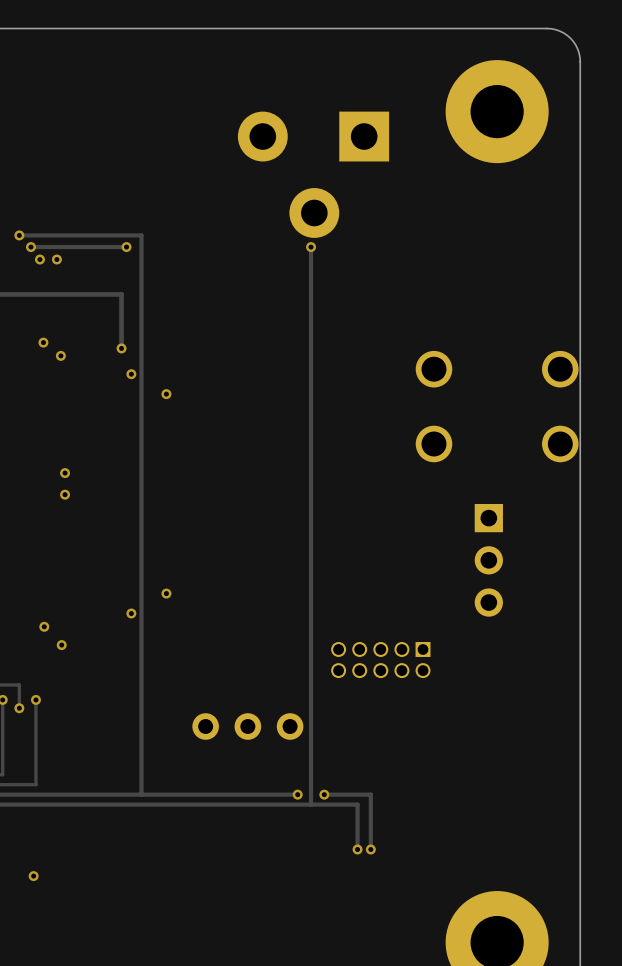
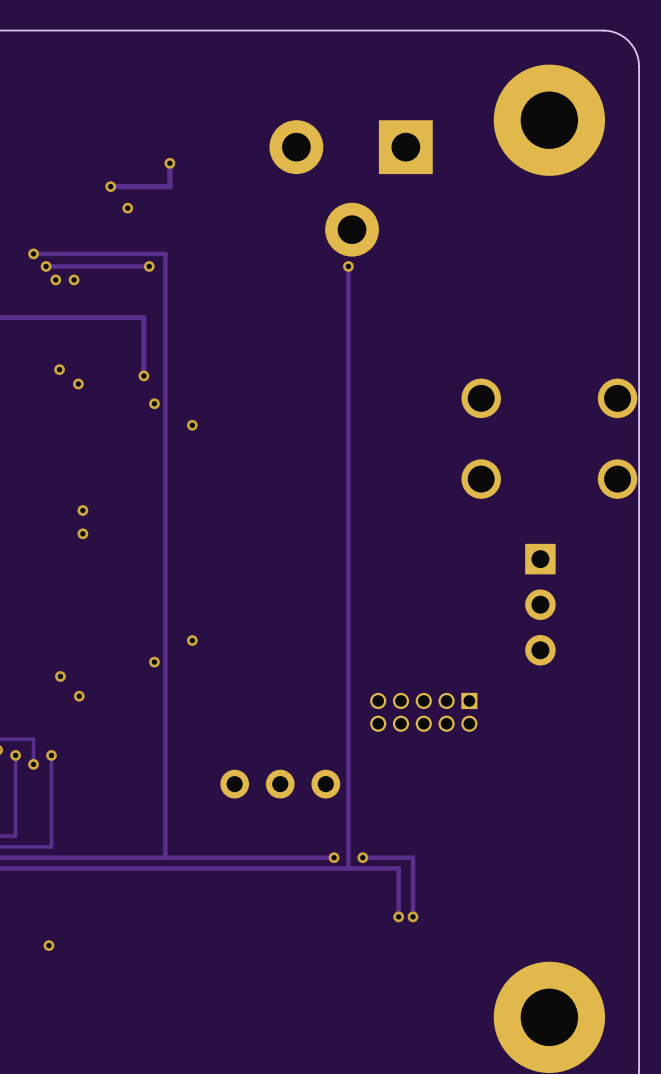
track: none -> (169, 163) (169, 186) (110, 186)
via: none -> (169, 163)
via: none -> (110, 186)
via: none -> (127, 208)

